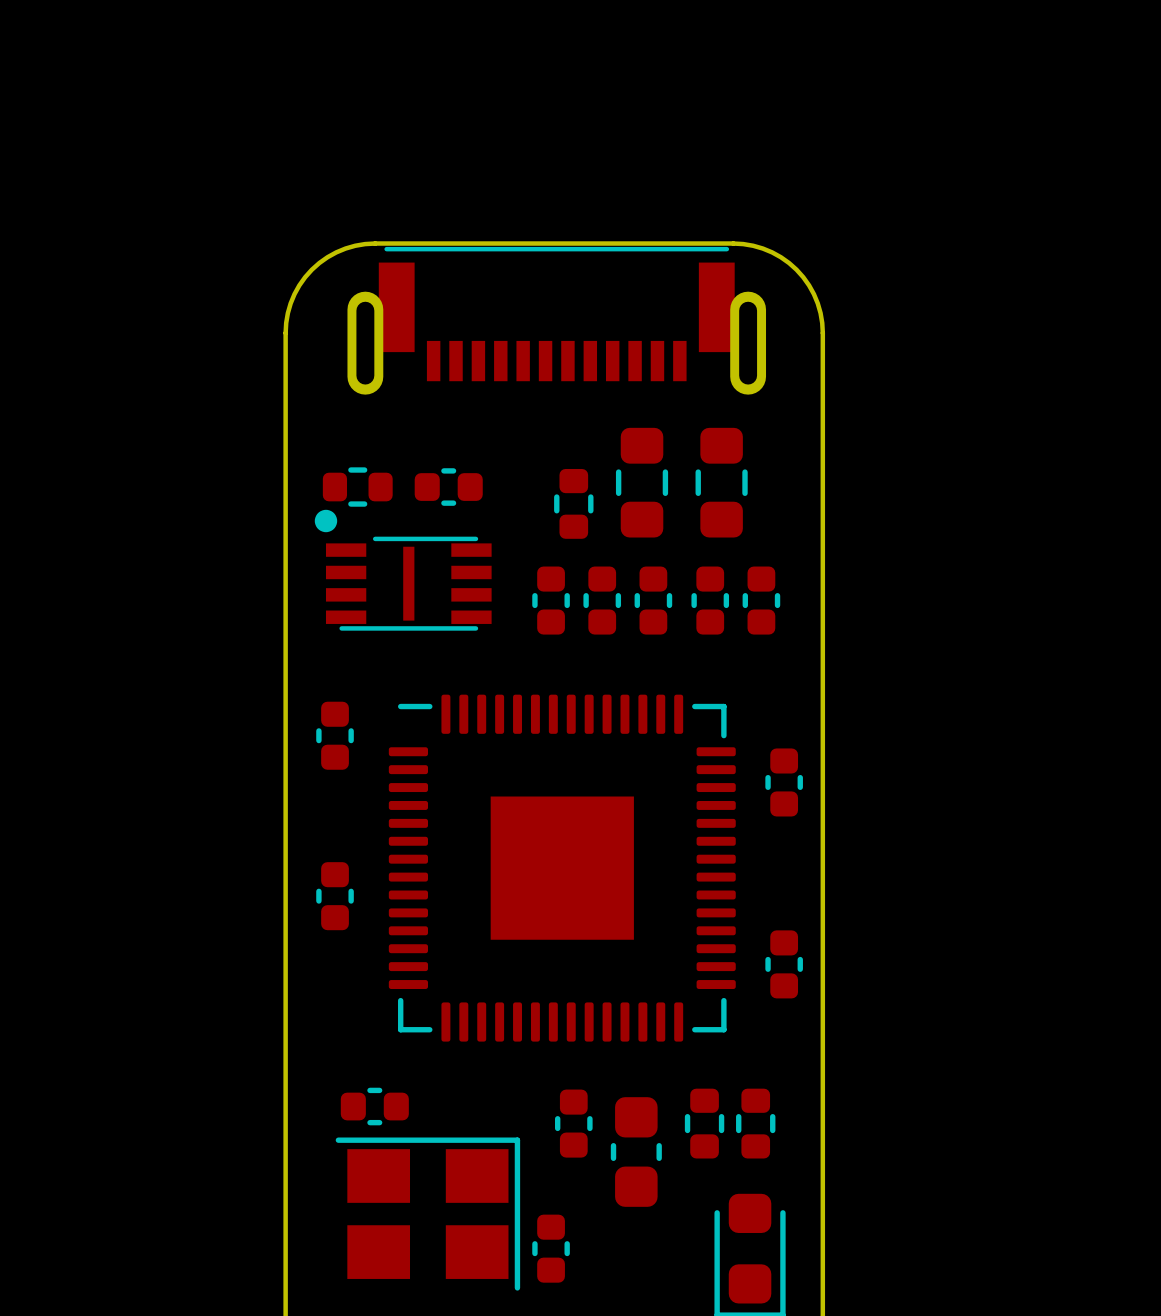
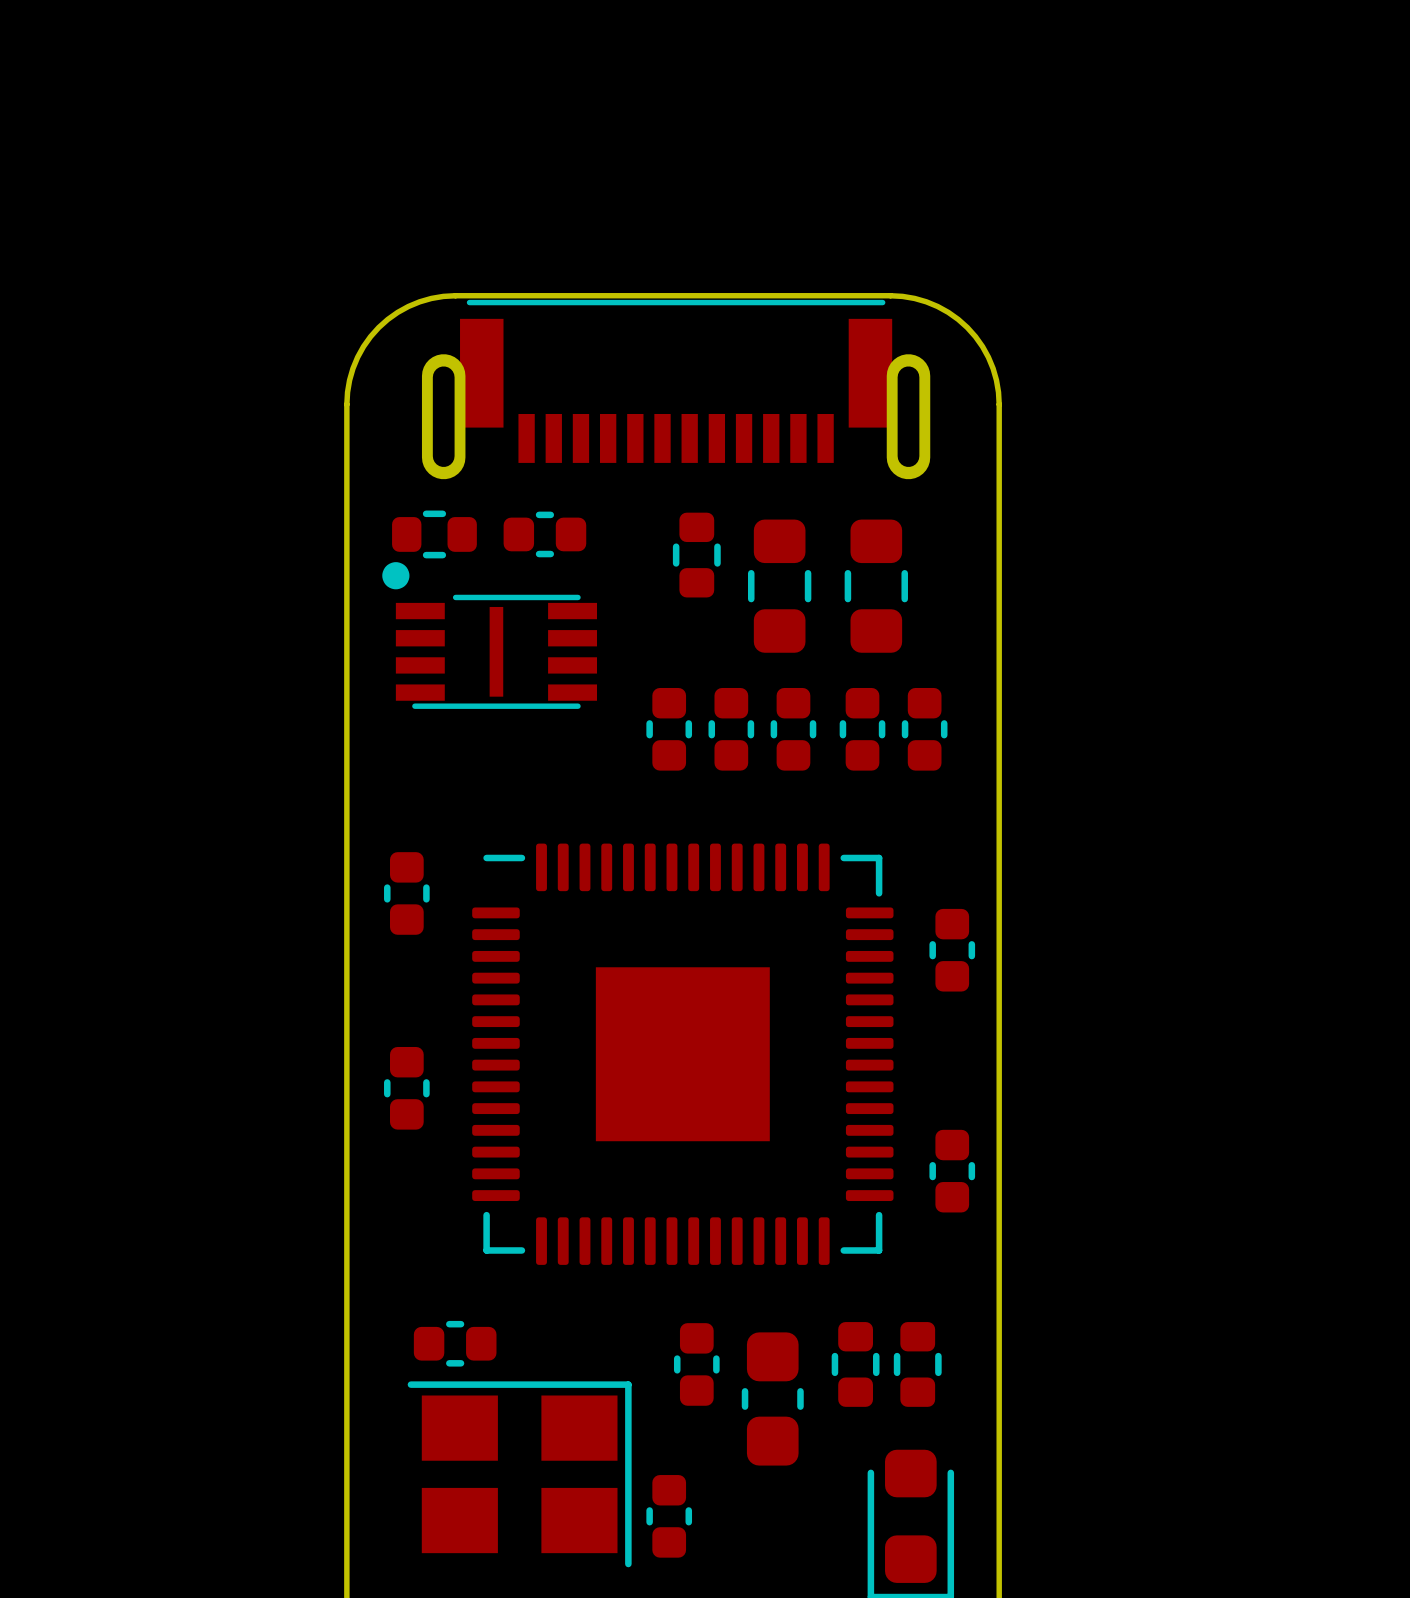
part position: (357, 487) -> (434, 534)
part position: (448, 487) -> (544, 534)
part position: (573, 503) -> (696, 555)
part position: (403, 570) -> (489, 635)

